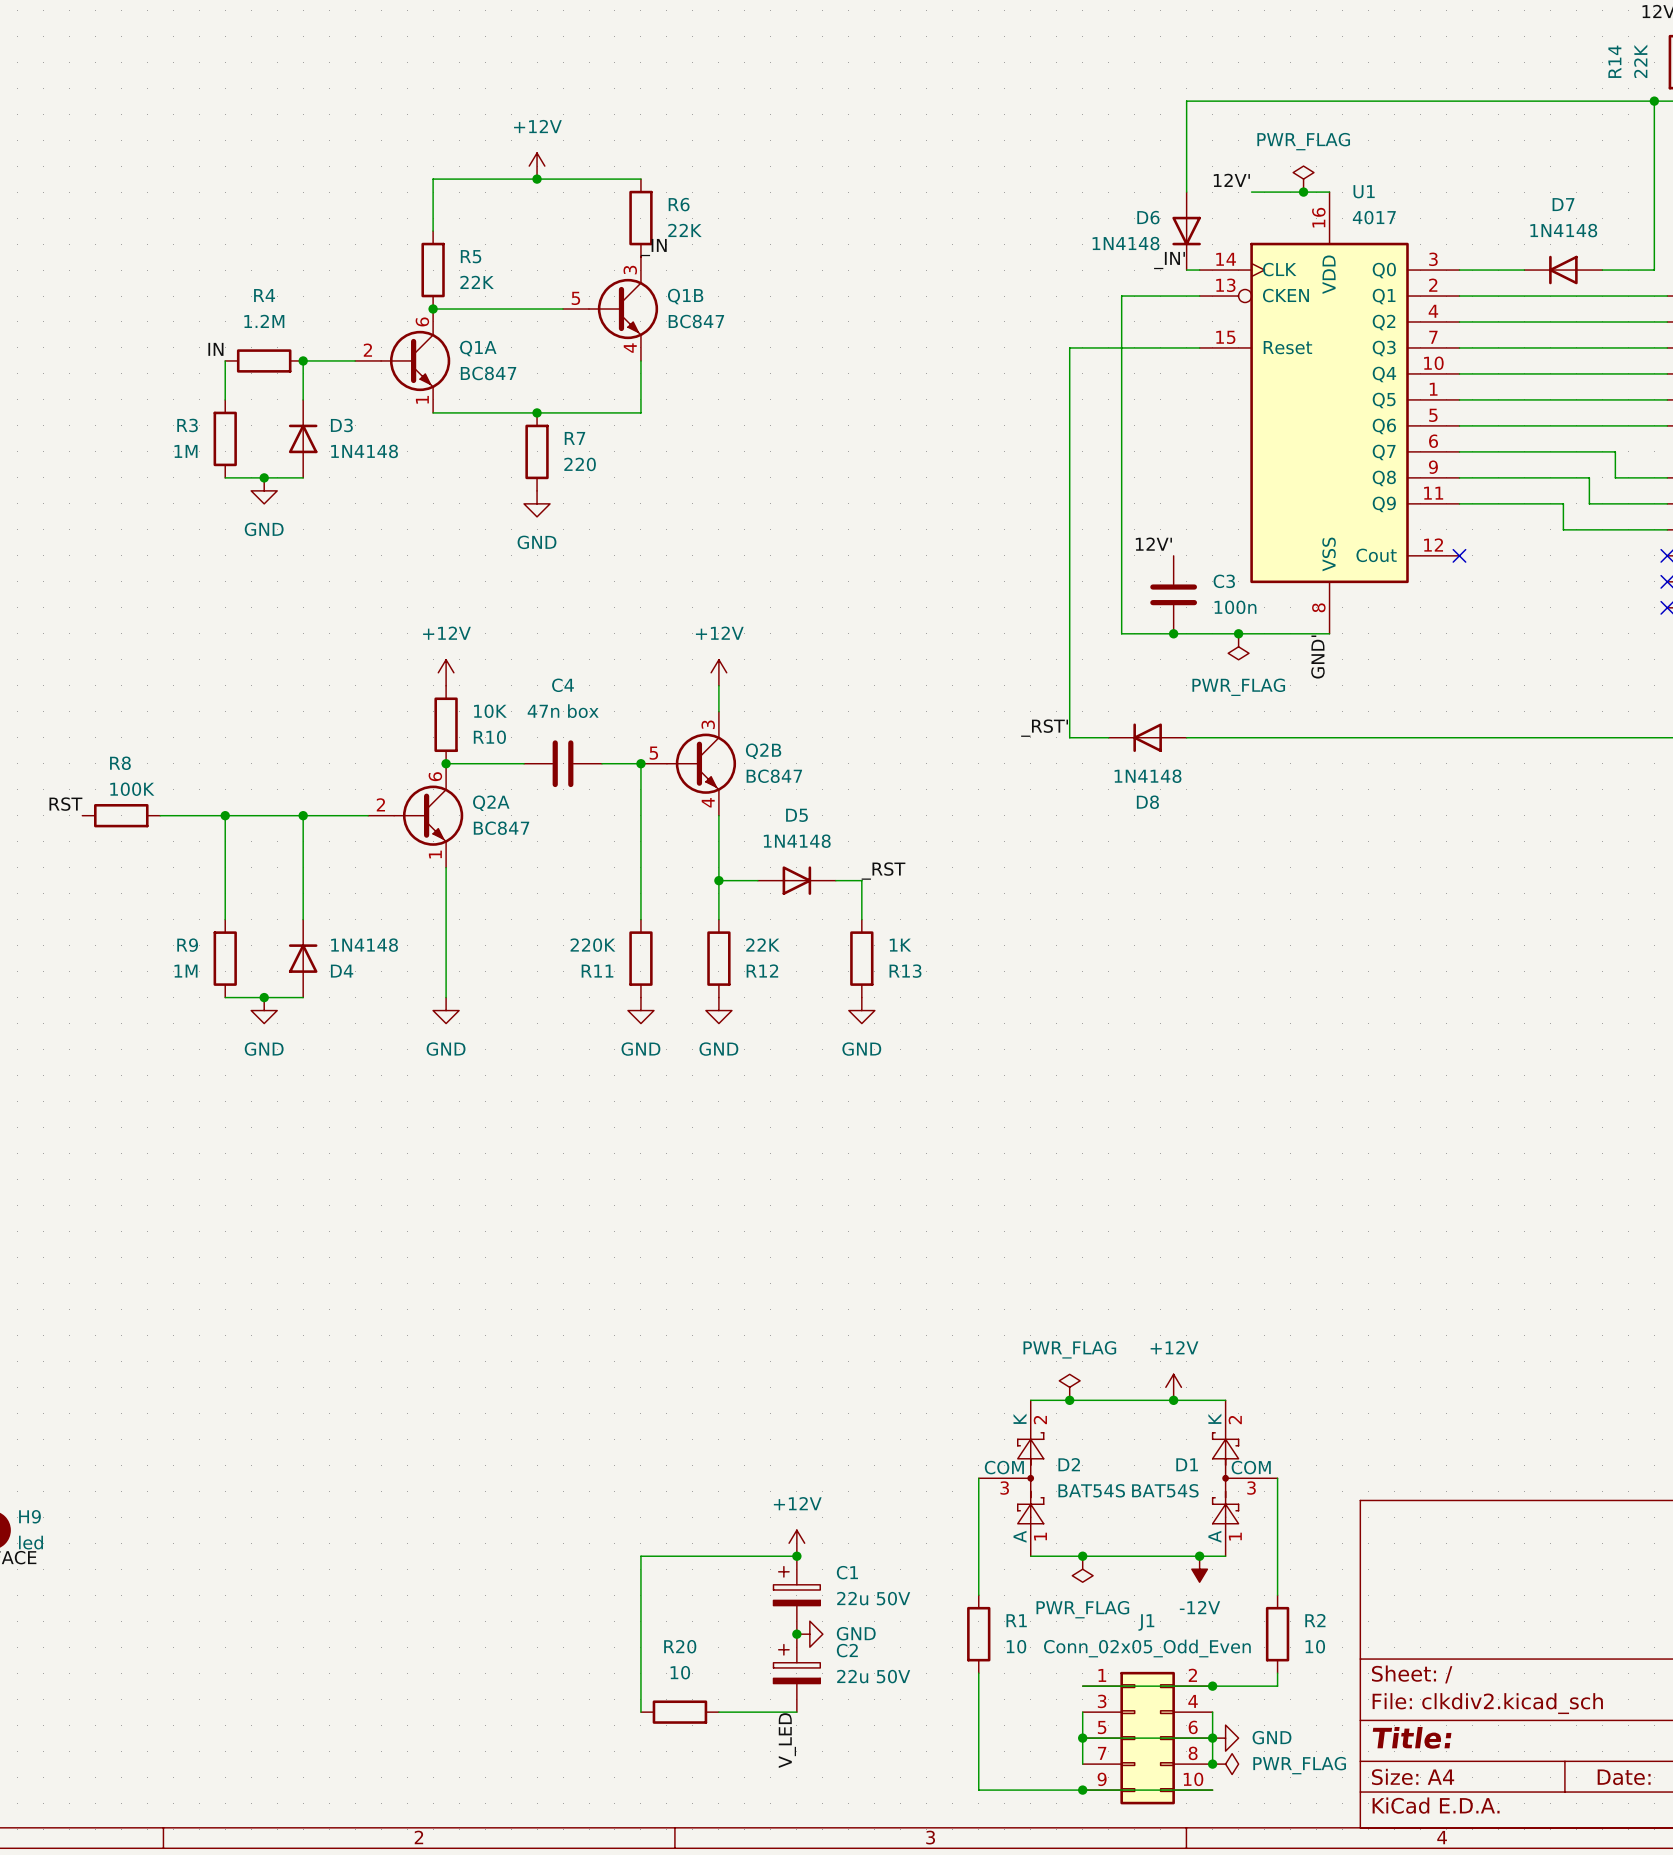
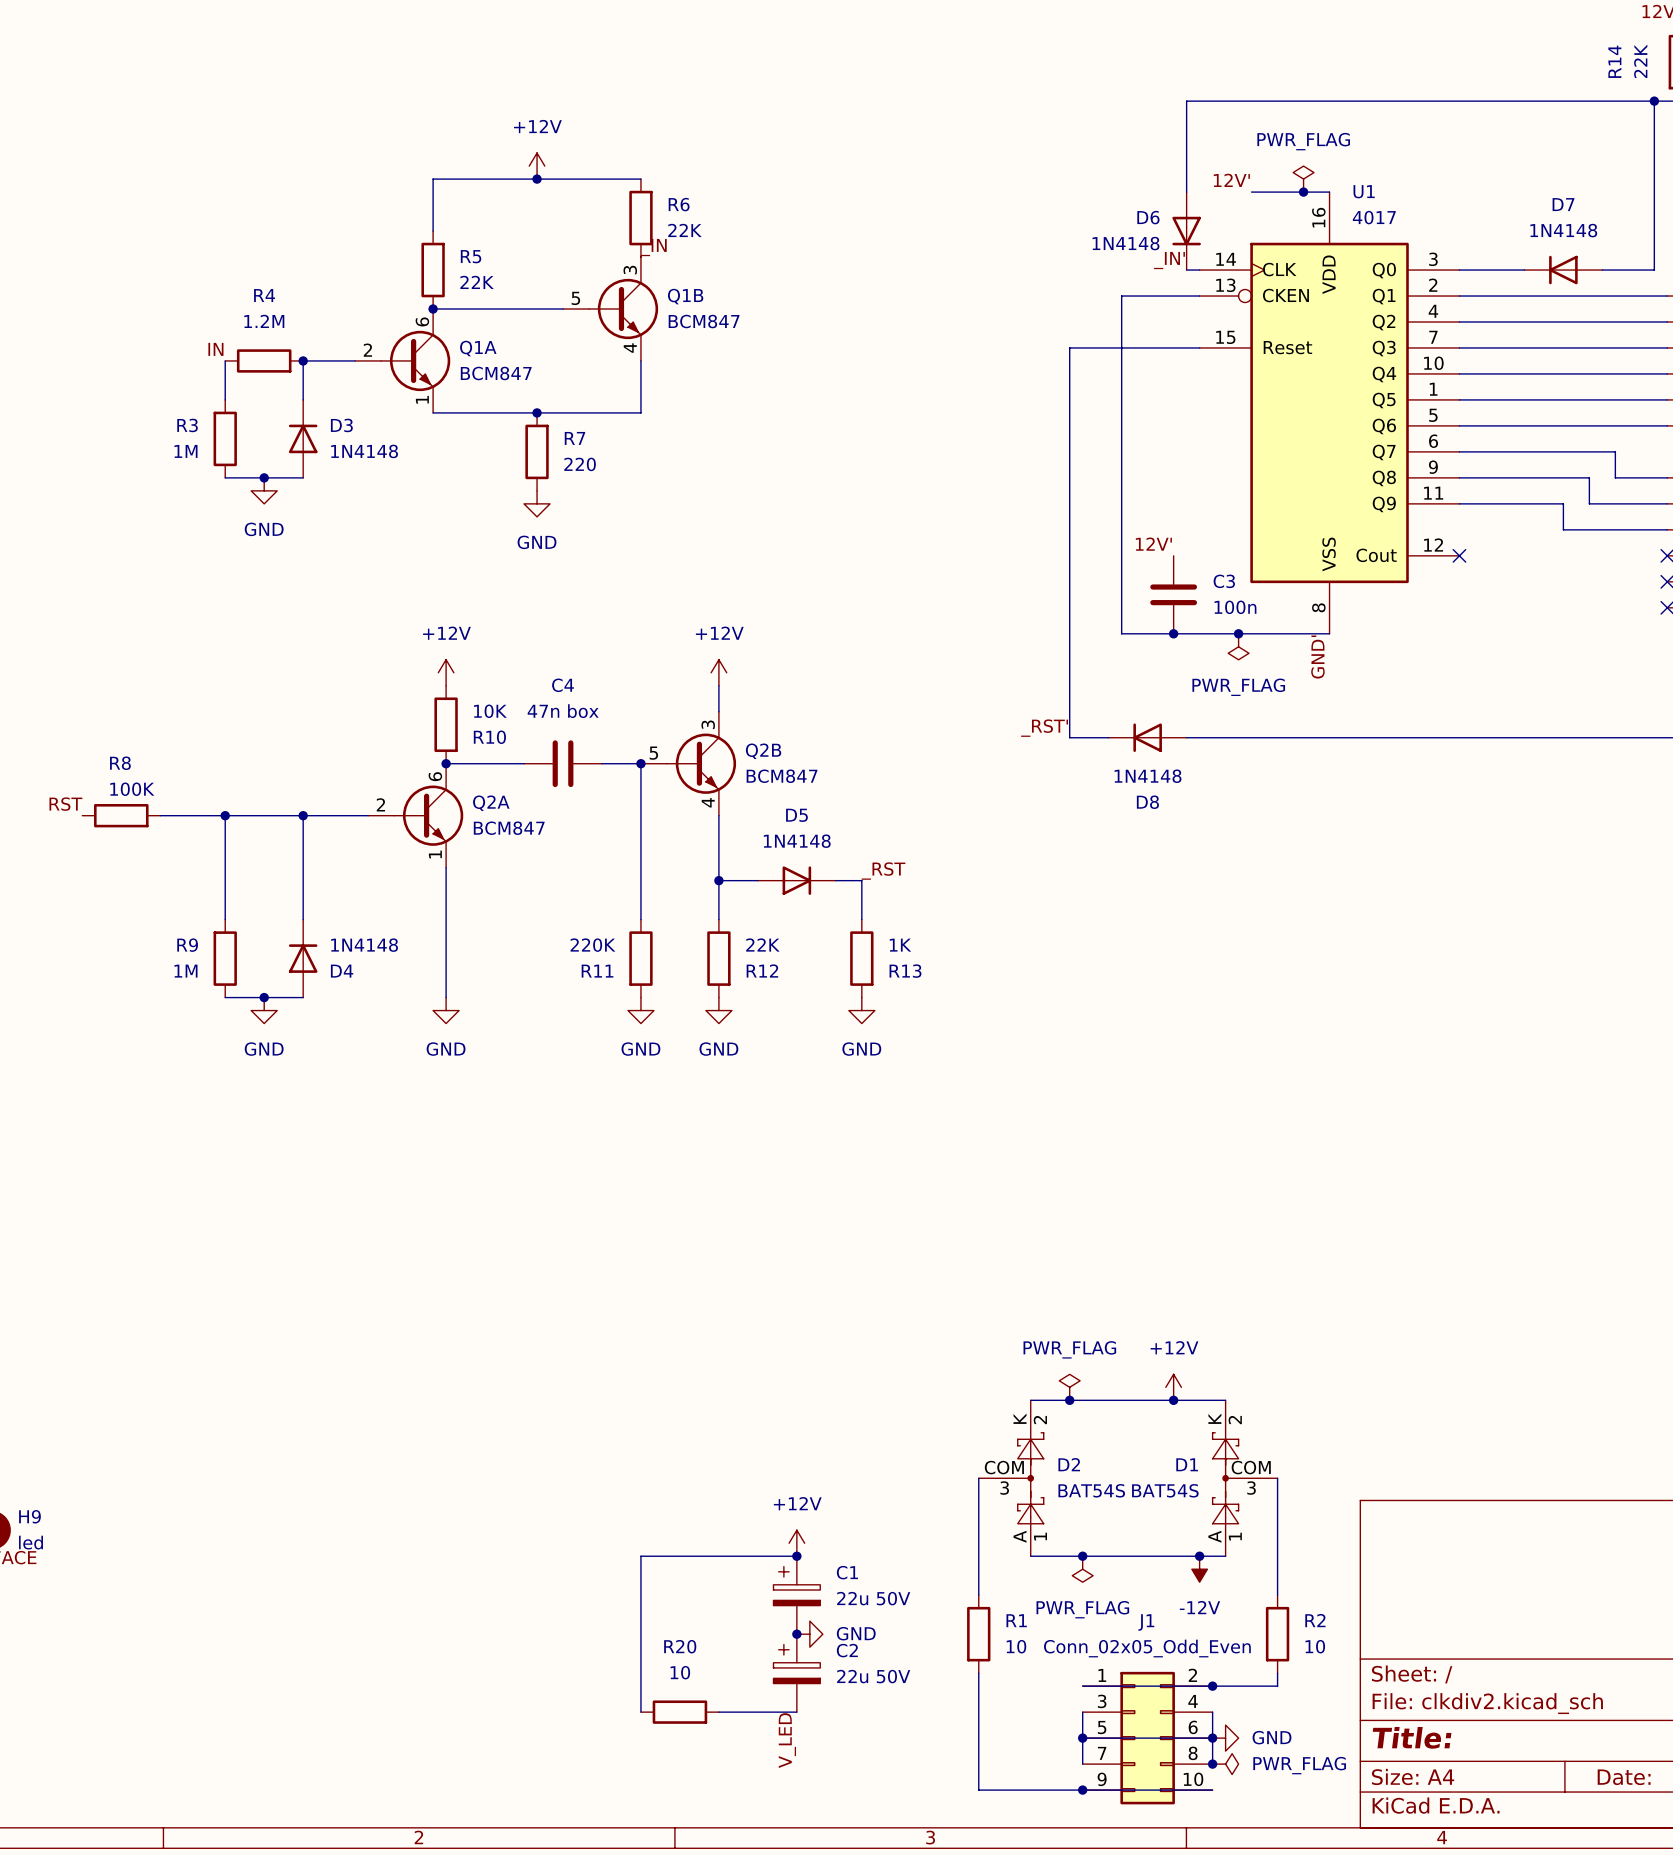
Q1B value: BC847 (696, 321) -> BCM847 (704, 321)
Q1A value: BC847 (488, 373) -> BCM847 (496, 373)
Q2B value: BC847 (774, 776) -> BCM847 (782, 776)
Q2A value: BC847 (501, 828) -> BCM847 (509, 828)

